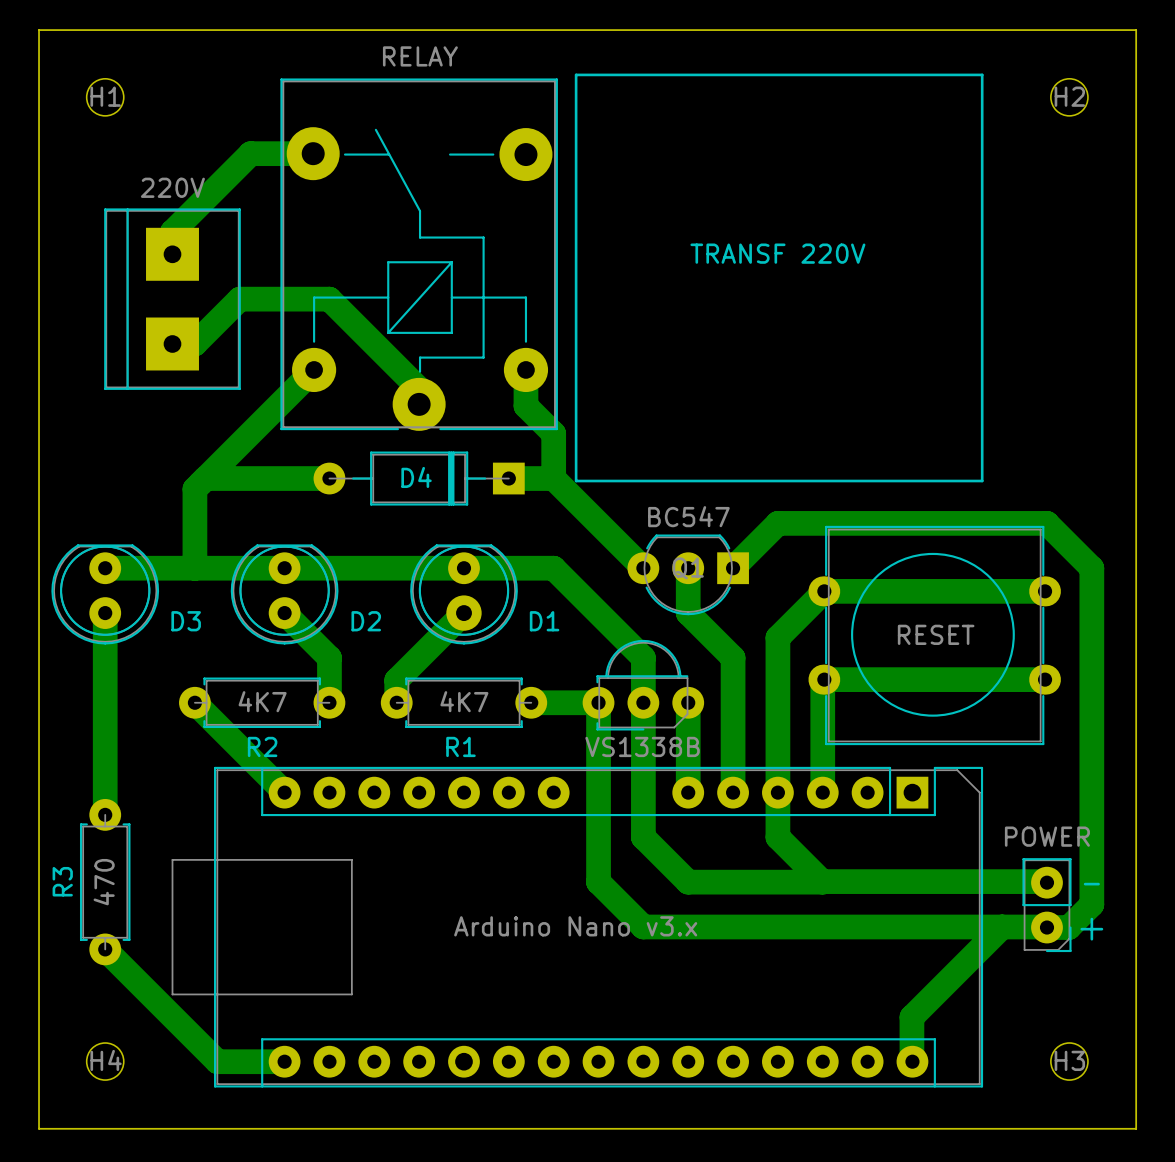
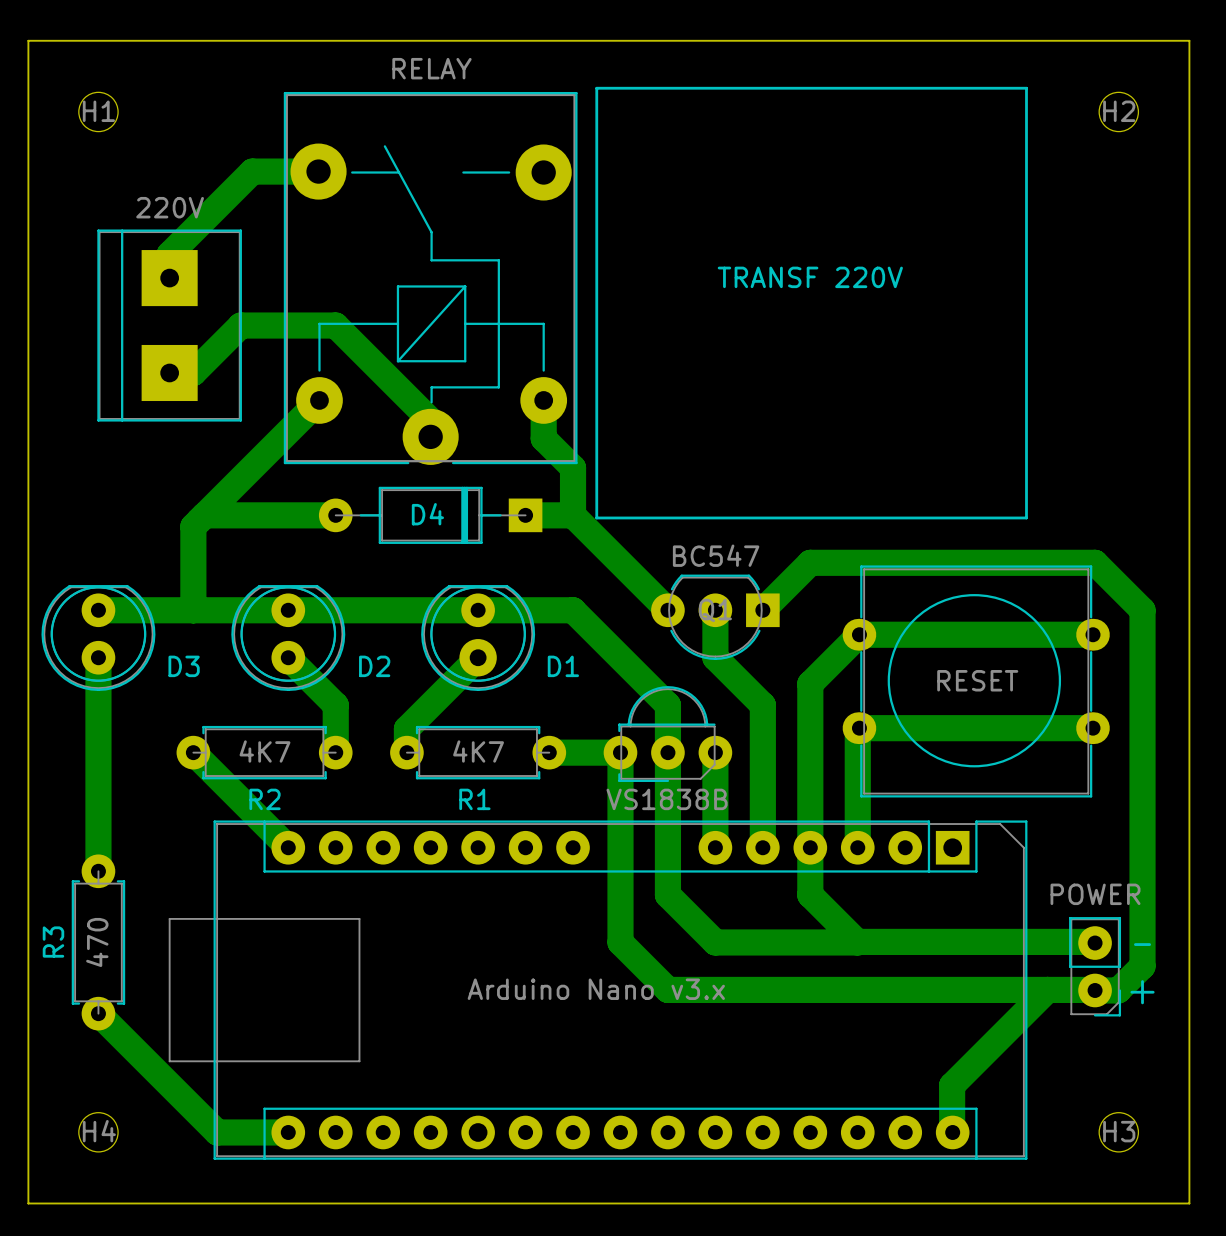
part value: VS1338B (642, 746) -> VS1838B (667, 799)

